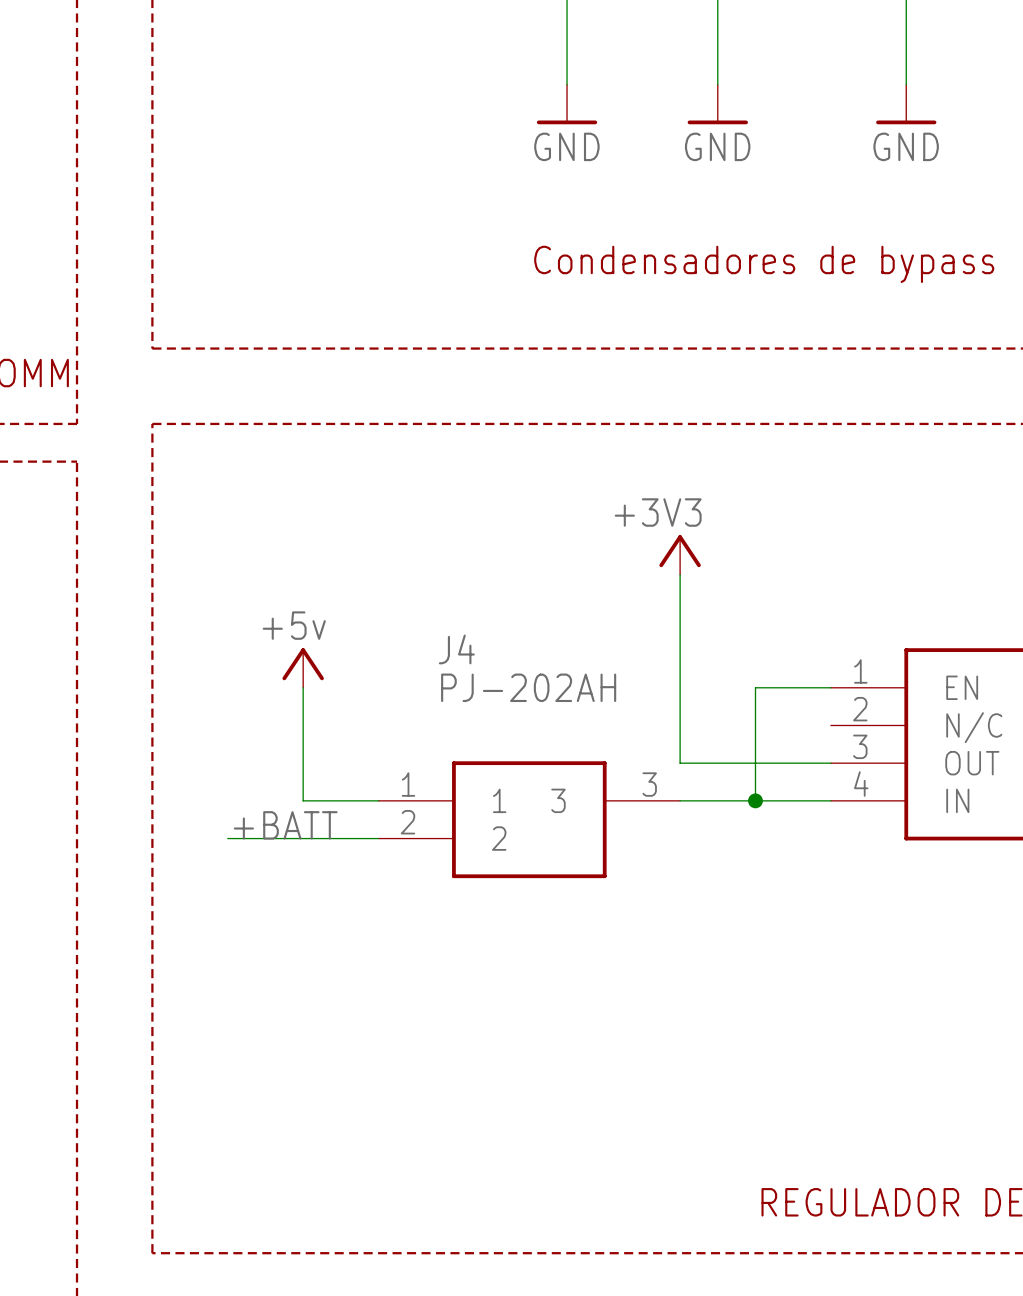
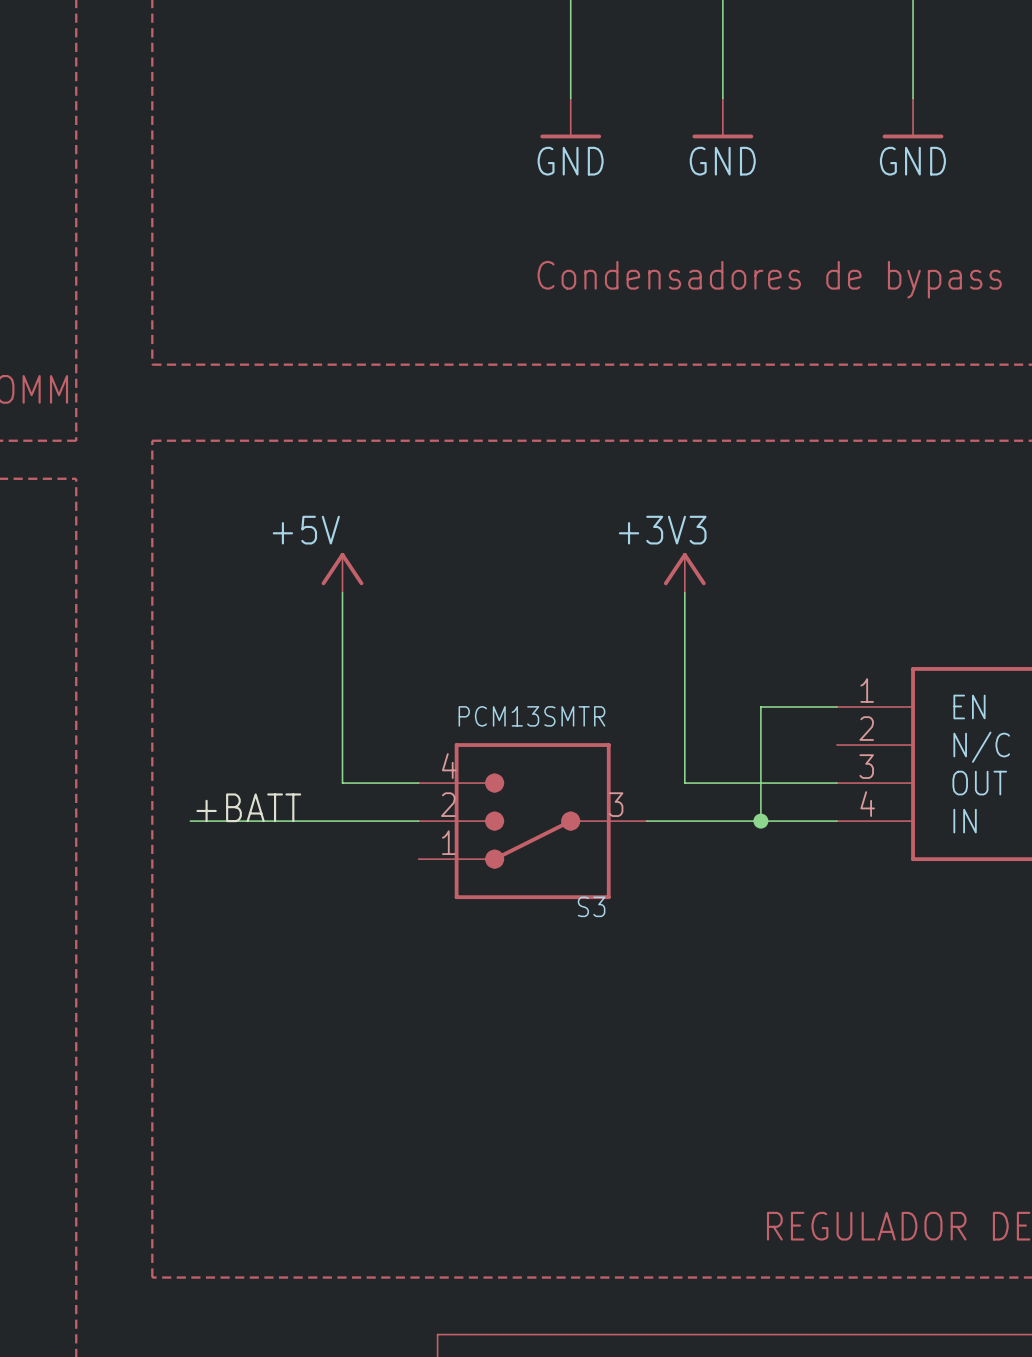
power symbol: none -> +5V (342, 572)
wire: none -> (342, 592) (342, 783) (418, 783)
power symbol: +5v (303, 668) -> none
wire: (303, 687) (303, 800) -> (190, 821) (304, 821)
S3: none -> PCM13SMTR (532, 821)
J4: PJ-202AH (529, 819) -> none
label position: +BATT (285, 825) -> +BATT (248, 807)
wire: (227, 838) (378, 838) -> none

